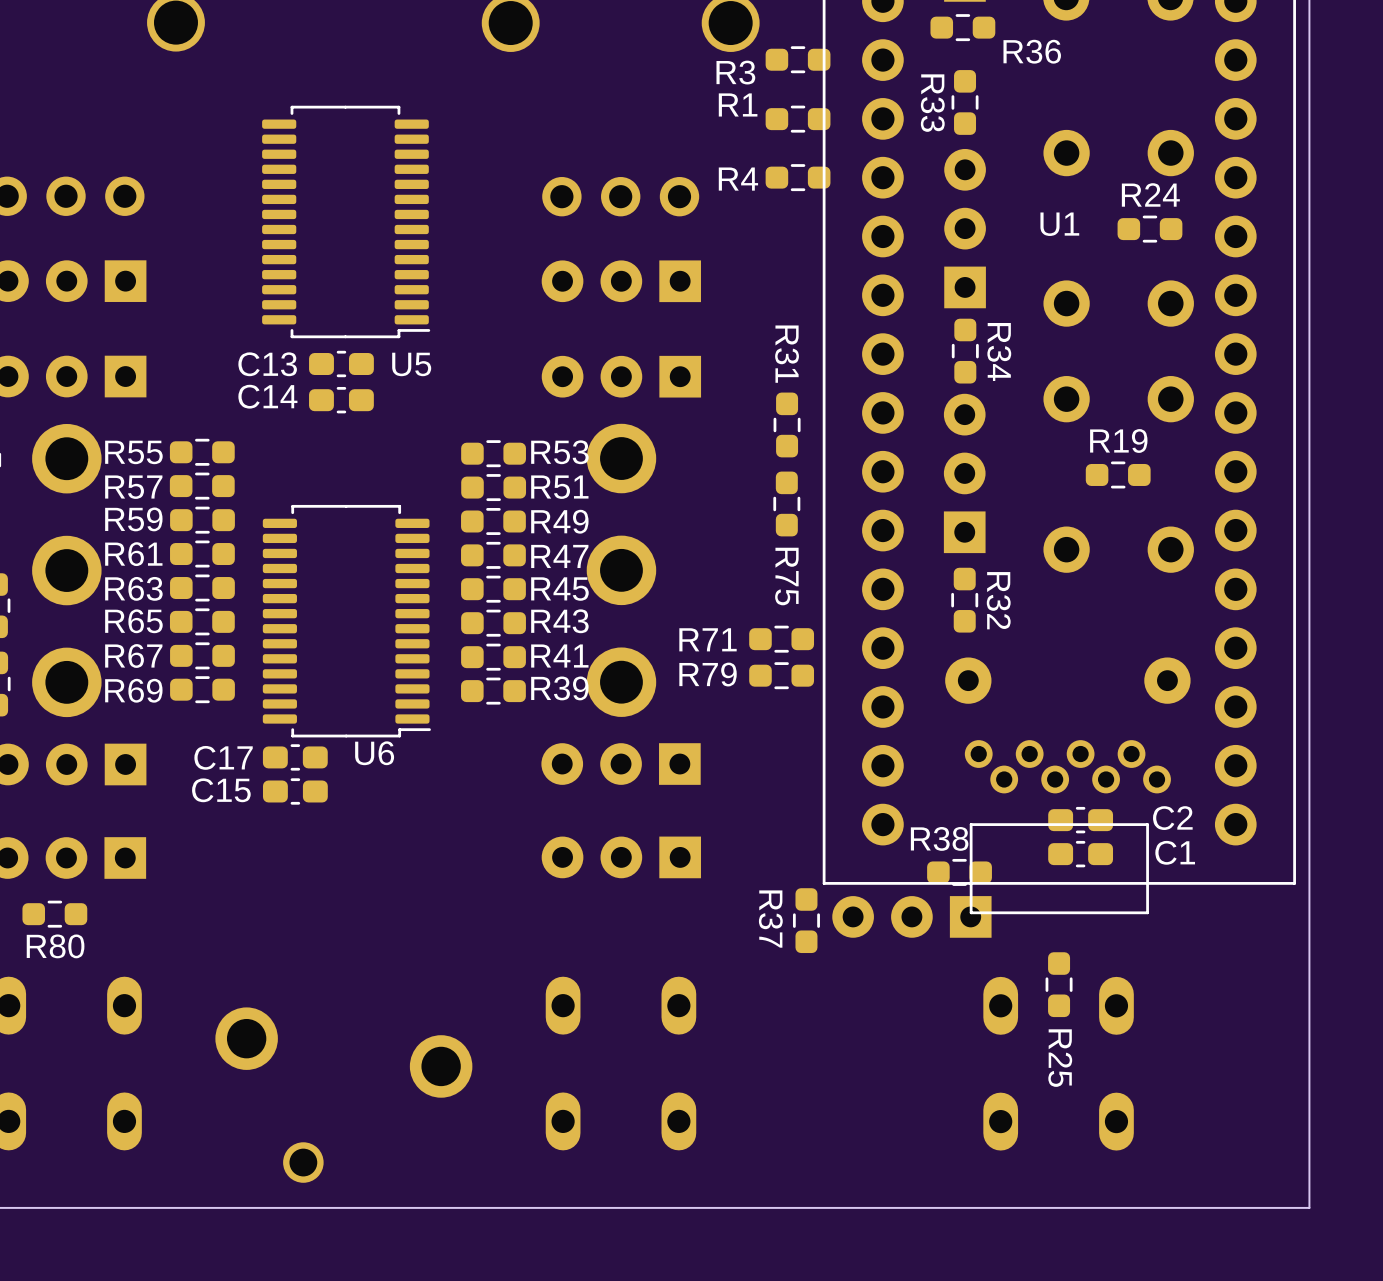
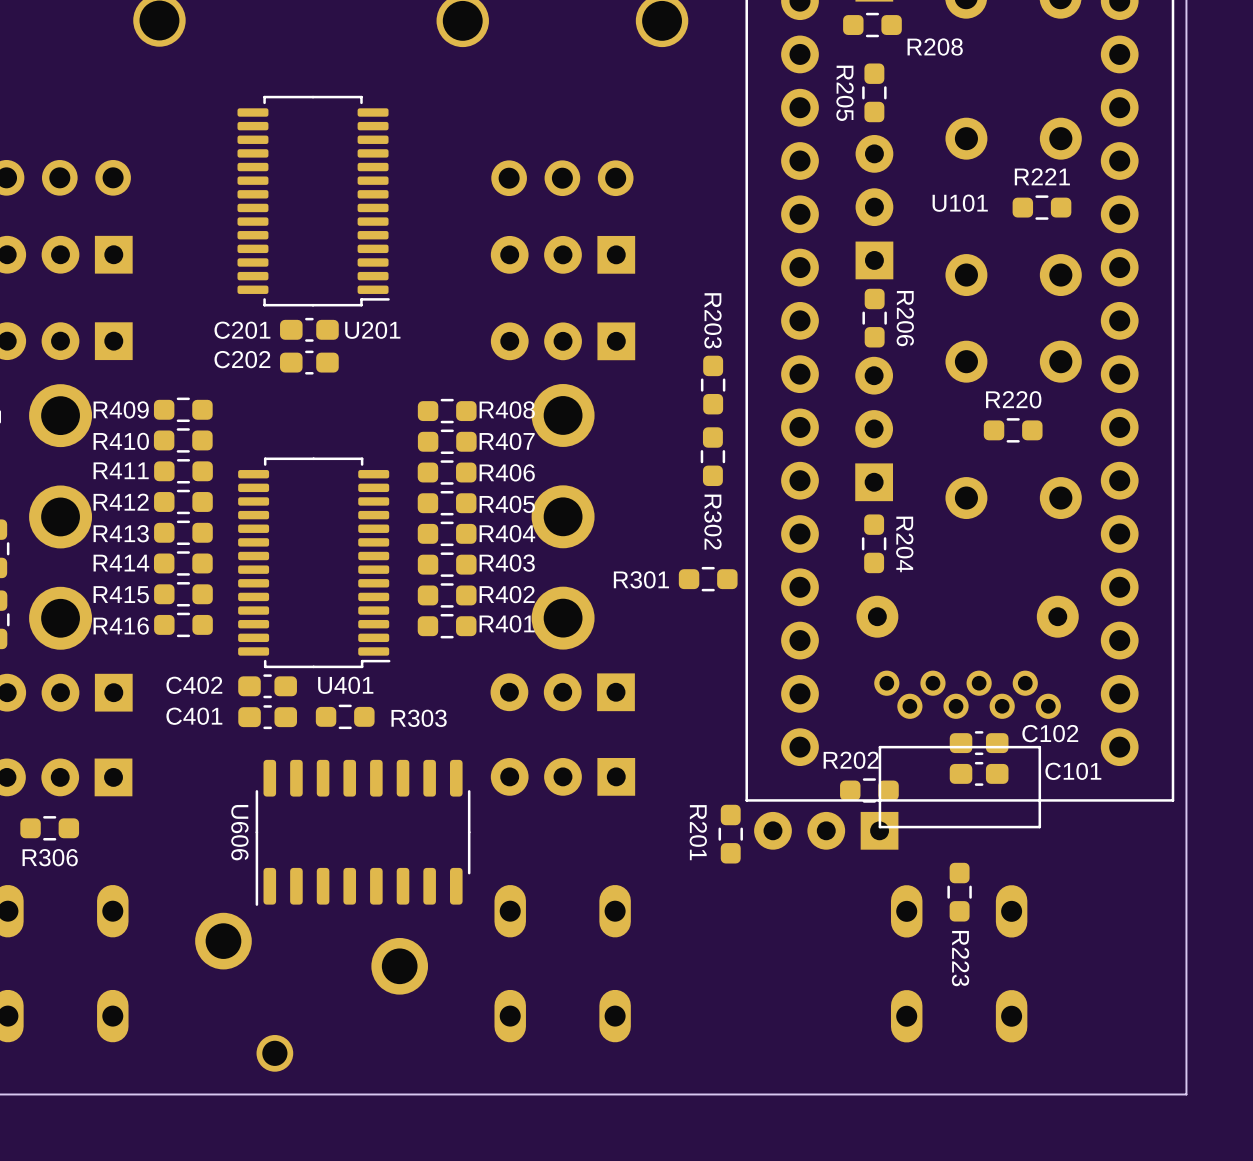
R36 name: R36 (1032, 51) -> R208 (935, 47)
R3: (798, 59) -> none
R33 name: R33 (932, 103) -> R205 (845, 93)
R1: (798, 119) -> none
R4: (798, 177) -> none
R24 name: R24 (1150, 194) -> R221 (1042, 176)
U1 name: U1 (1059, 224) -> U101 (960, 203)
R34 name: R34 (999, 351) -> R206 (905, 318)
R31 name: R31 (787, 354) -> R203 (712, 320)
C13 name: C13 (267, 364) -> C201 (242, 330)
U5 name: U5 (411, 364) -> U201 (372, 330)
C14 name: C14 (267, 396) -> C202 (242, 359)
R19 name: R19 (1118, 440) -> R220 (1013, 399)
R55 name: R55 (133, 452) -> R409 (121, 409)
R53 name: R53 (559, 452) -> R408 (507, 409)
R57 name: R57 (133, 487) -> R410 (121, 441)
R51 name: R51 (559, 487) -> R407 (507, 441)
R59 name: R59 (133, 519) -> R411 (121, 470)
R49 name: R49 (559, 521) -> R406 (507, 472)
R61 name: R61 (133, 554) -> R412 (121, 502)
R47 name: R47 (559, 556) -> R405 (507, 504)
R75 name: R75 (786, 576) -> R302 (712, 522)
R63 name: R63 (133, 588) -> R413 (121, 533)
R45 name: R45 (559, 589) -> R404 (507, 533)
R32 name: R32 (998, 600) -> R204 (904, 544)
R65 name: R65 (133, 621) -> R414 (121, 563)
R43 name: R43 (559, 621) -> R403 (507, 563)
R71 name: R71 (708, 639) -> R301 (641, 579)
R67 name: R67 (133, 656) -> R415 (121, 594)
R41 name: R41 (559, 656) -> R402 (507, 594)
R79: (781, 675) -> none
R39 name: R39 (559, 688) -> R401 (507, 623)
R69 name: R69 (133, 690) -> R416 (121, 626)
U6 name: U6 (374, 753) -> U401 (345, 685)
C17 name: C17 (223, 757) -> C402 (194, 685)
C15 name: C15 (221, 790) -> C401 (194, 716)
R303: none -> (345, 716)
C2 name: C2 (1172, 818) -> C102 (1050, 733)
R38 name: R38 (939, 838) -> R202 (851, 760)
C1 name: C1 (1175, 852) -> C101 (1073, 771)
U606: none -> (363, 832)
R37 name: R37 (770, 919) -> R201 (698, 832)
R80 name: R80 (55, 946) -> R306 (50, 857)
R25 name: R25 (1060, 1058) -> R223 (960, 958)

